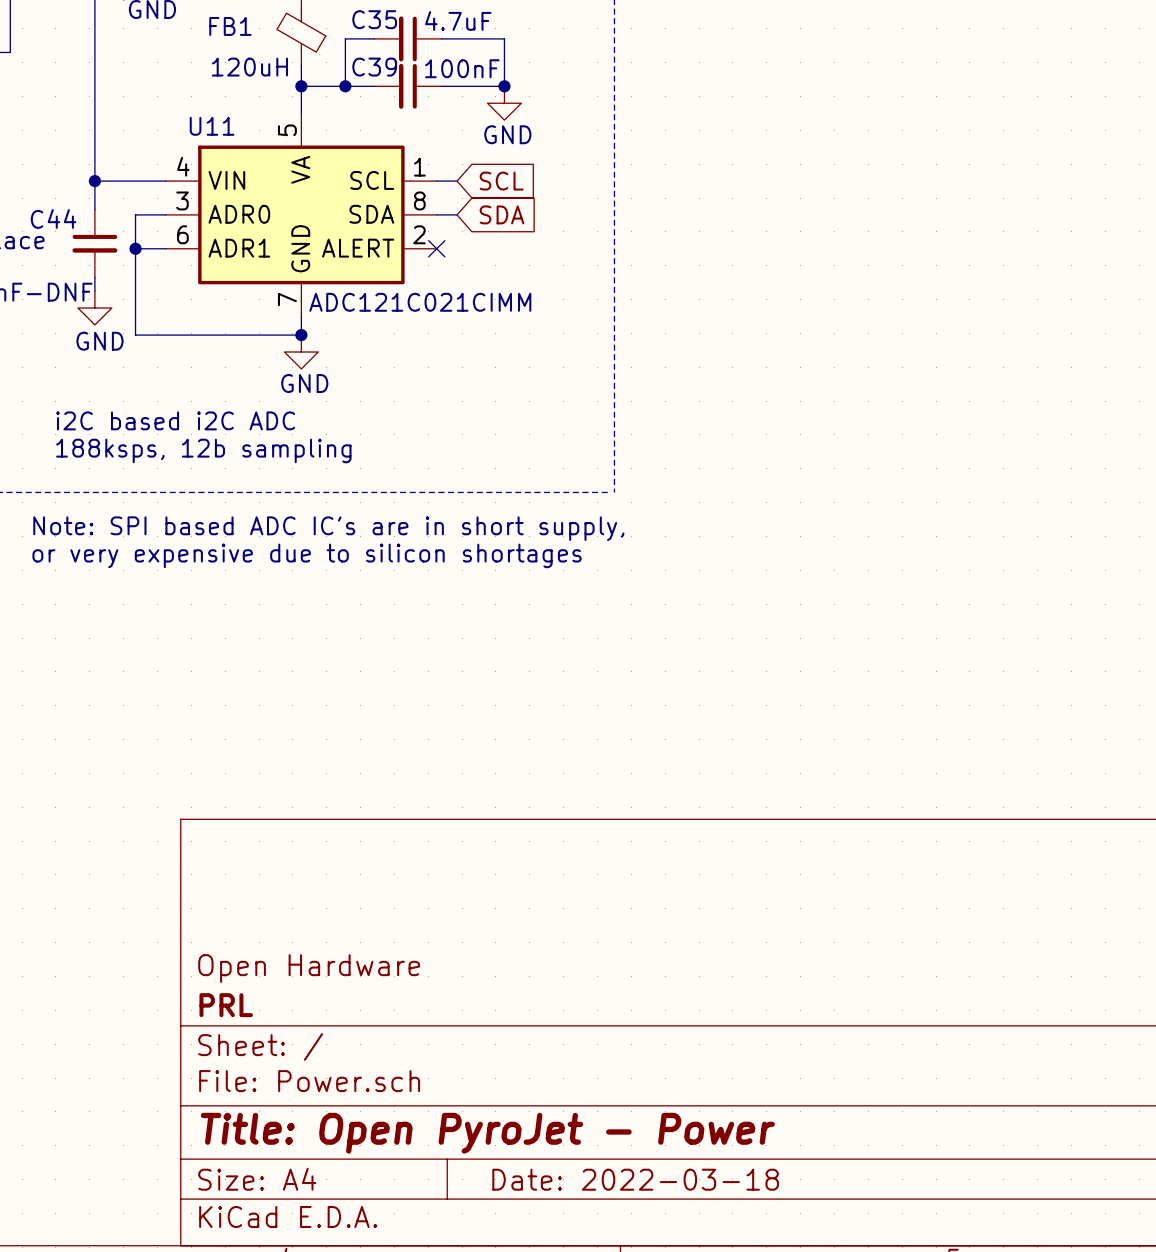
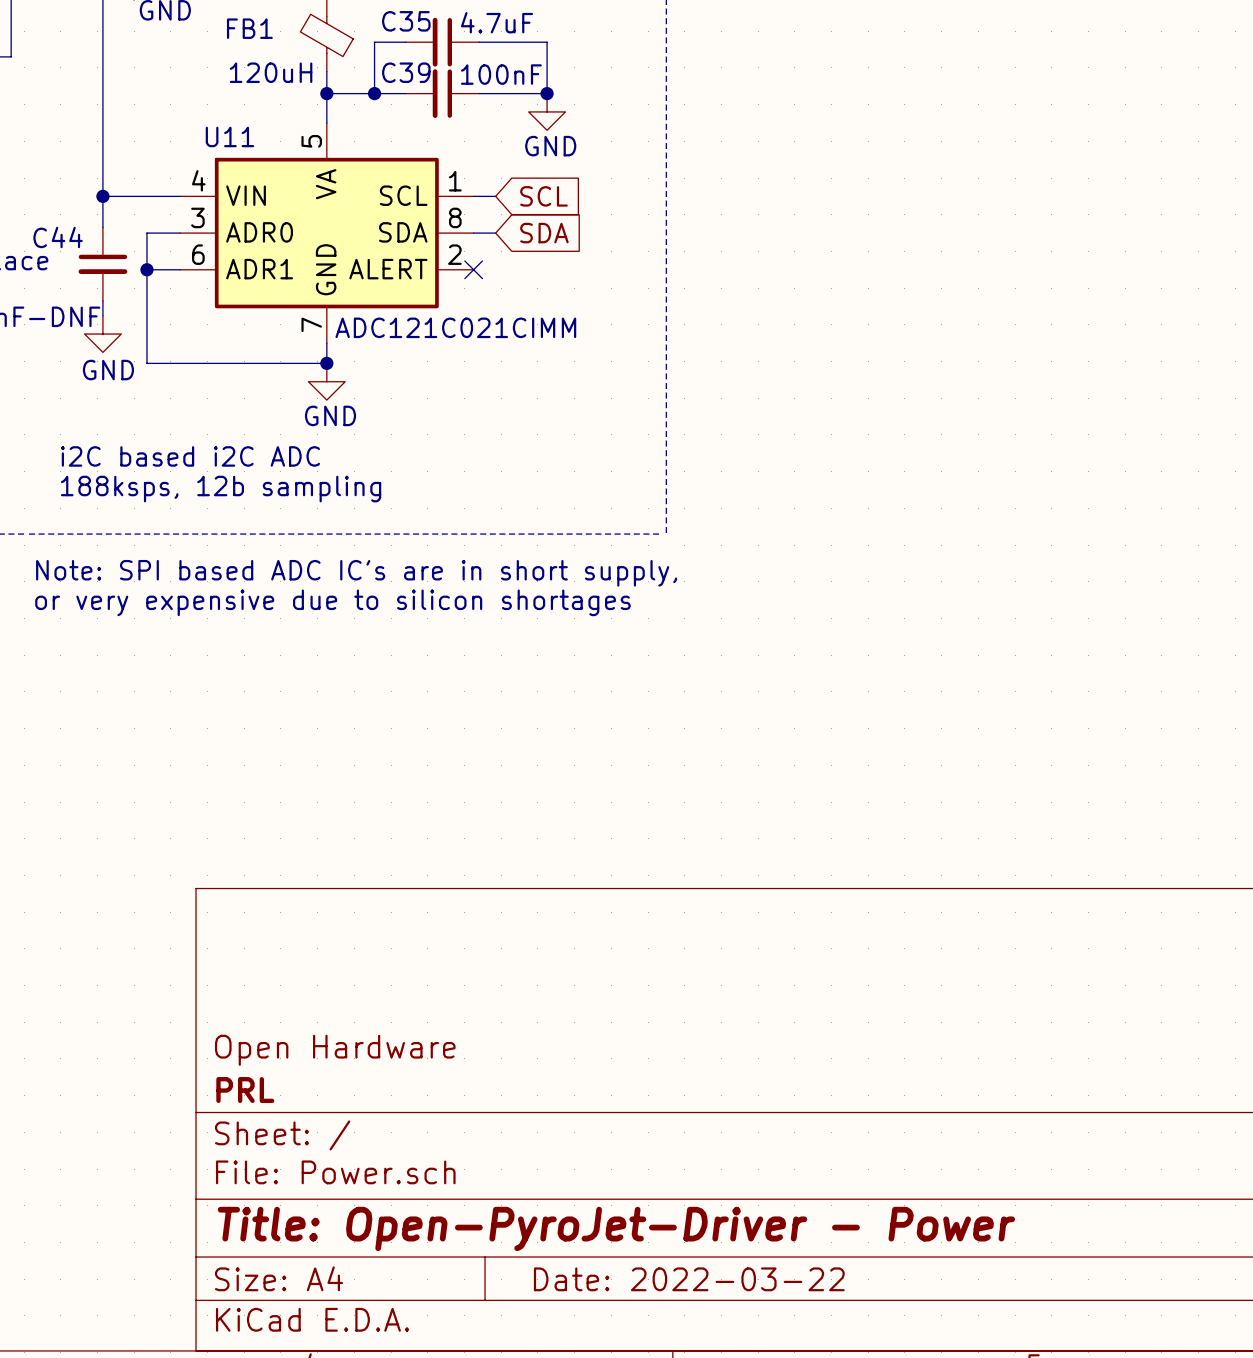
title block: Title: Open PyroJet - Power (487, 1133) -> Title: Open-PyroJet-Driver - Power (616, 1228)
title block: Date: 2022-03-18 (635, 1179) -> Date: 2022-03-22 (689, 1279)

